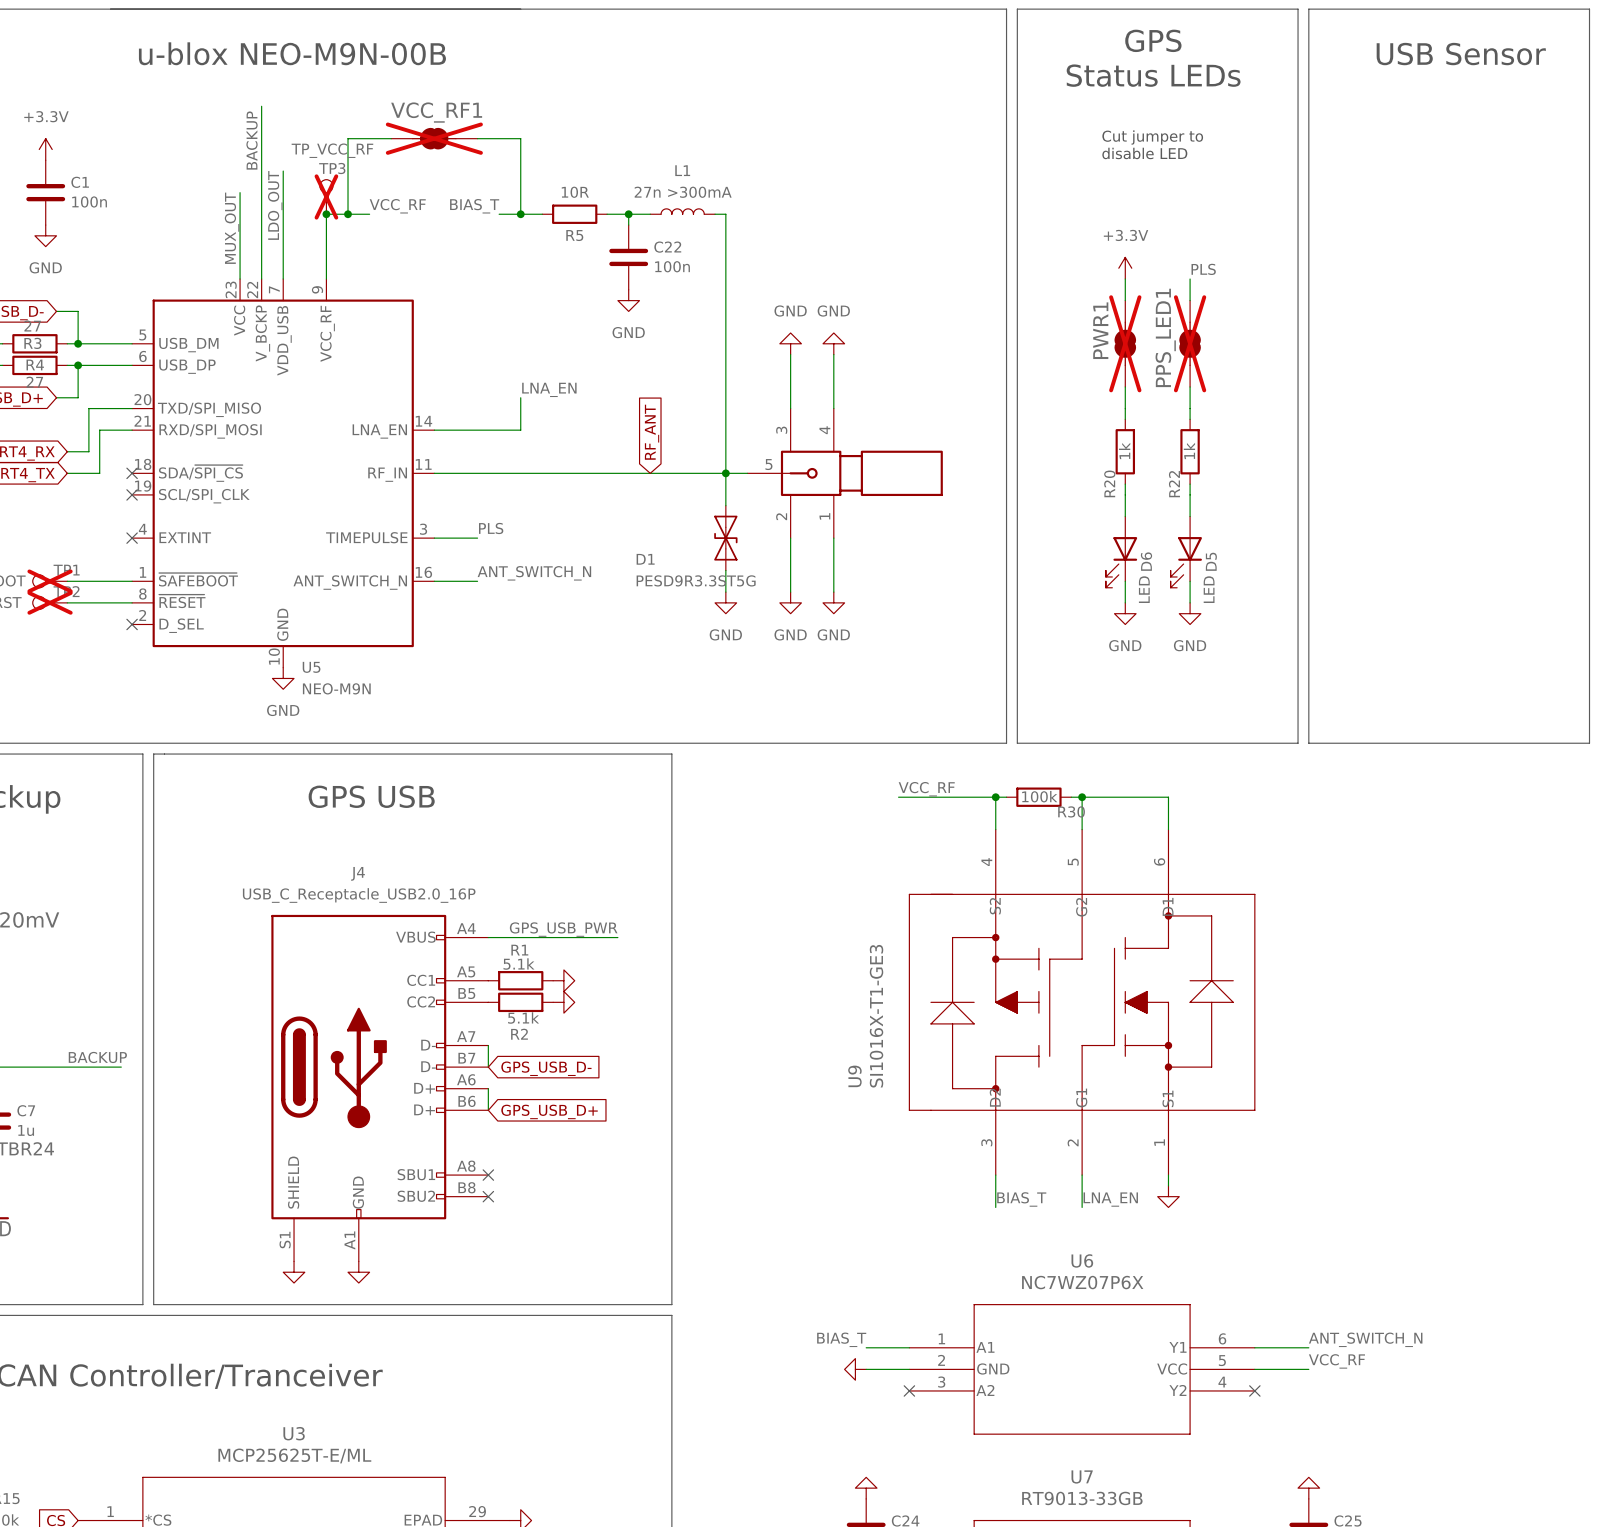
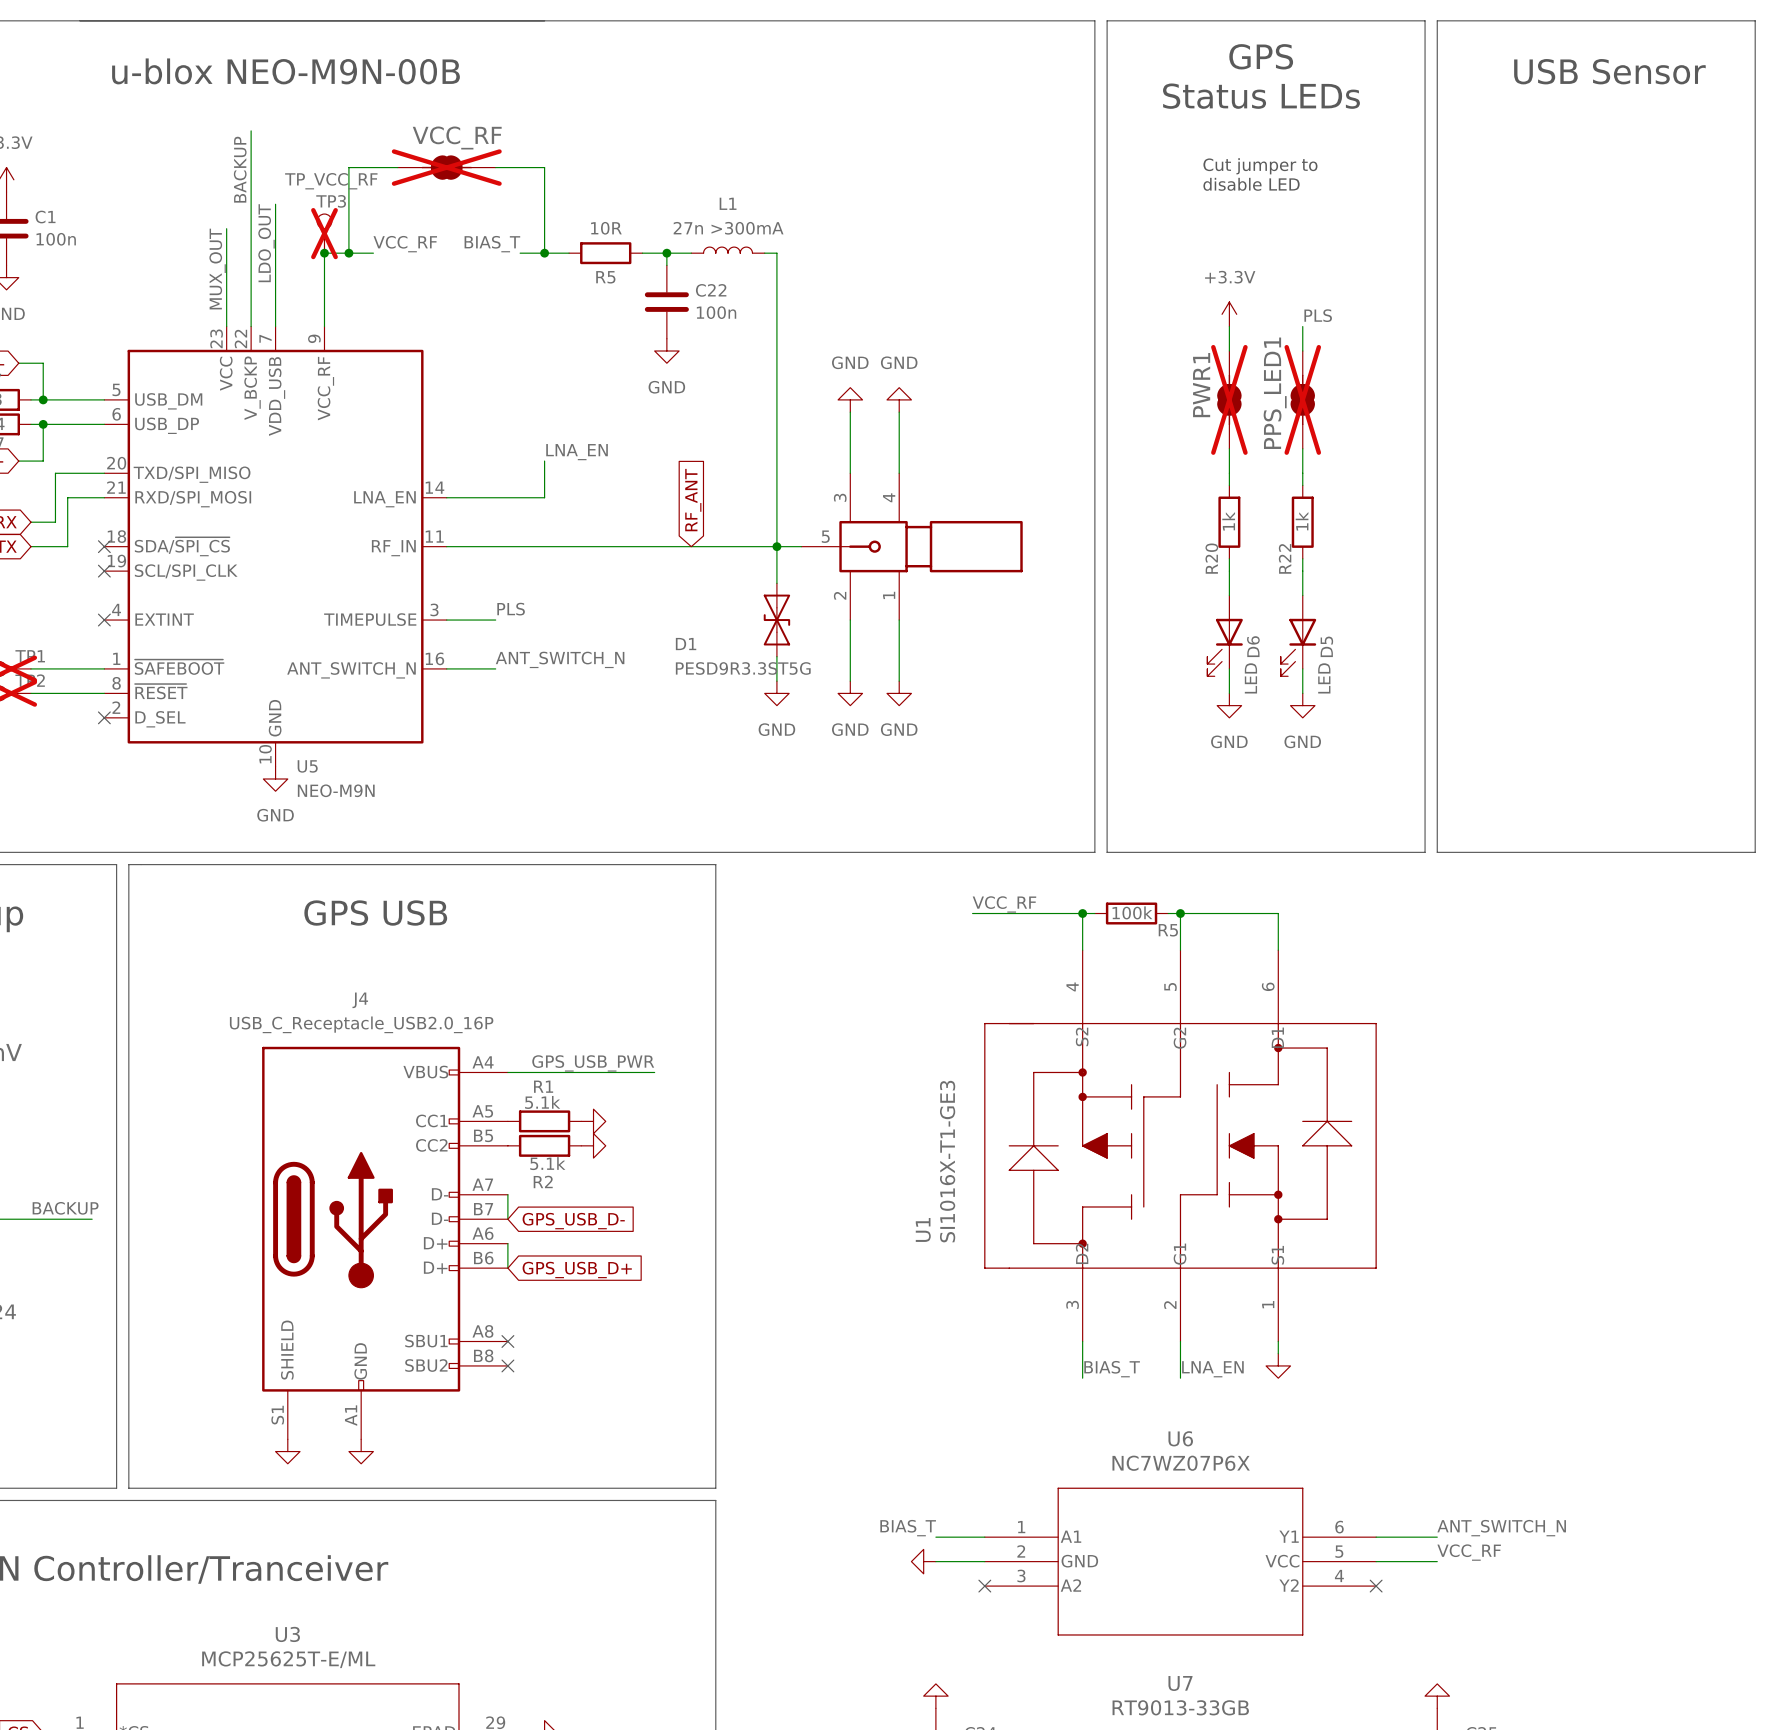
VCC_RF1 name: VCC_RF1 (436, 112) -> VCC_RF (457, 137)
R30 name: R30 (1071, 811) -> R5 (1168, 930)
U9 name: U9 (854, 1076) -> U1 (923, 1229)

